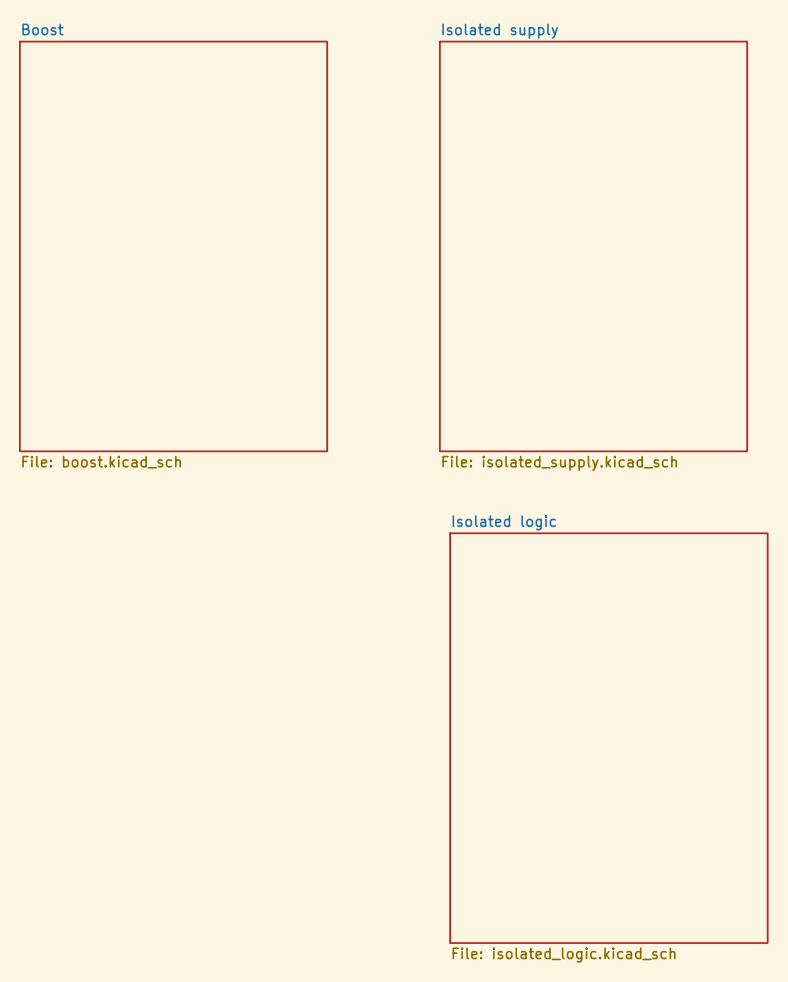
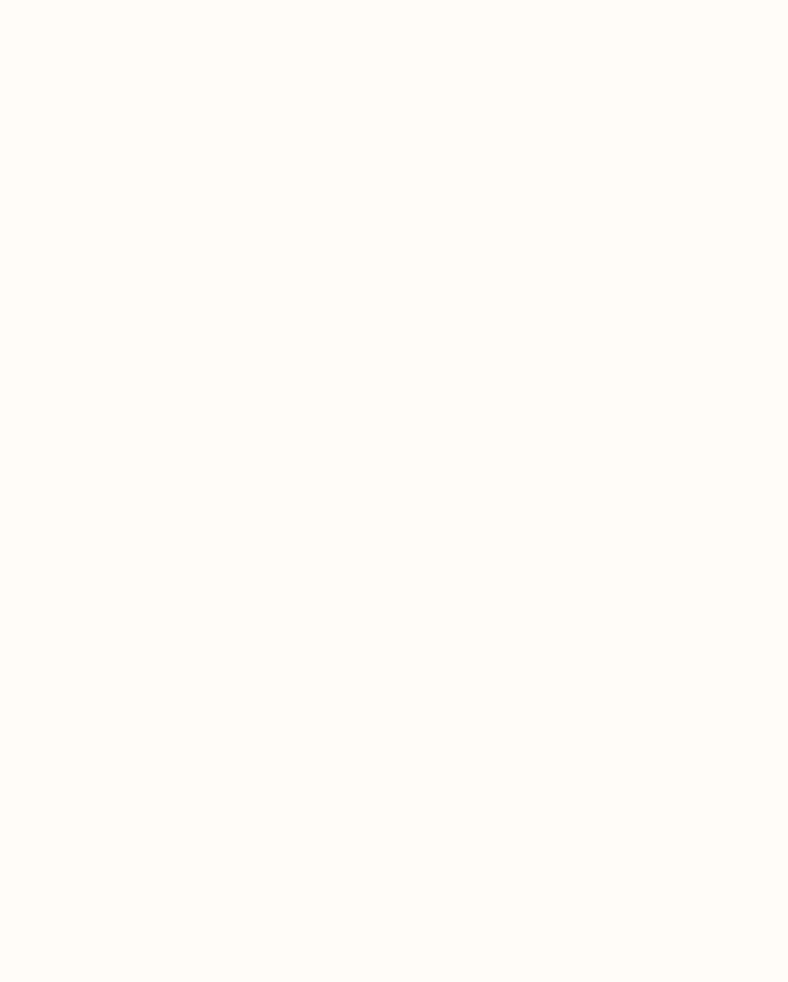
sheet Boost: File: boost.kicad_sch (173, 246) -> none
sheet Isolated supply: File: isolated_supply.kicad_sch (593, 246) -> none
sheet Isolated logic: File: isolated_logic.kicad_sch (608, 738) -> none

